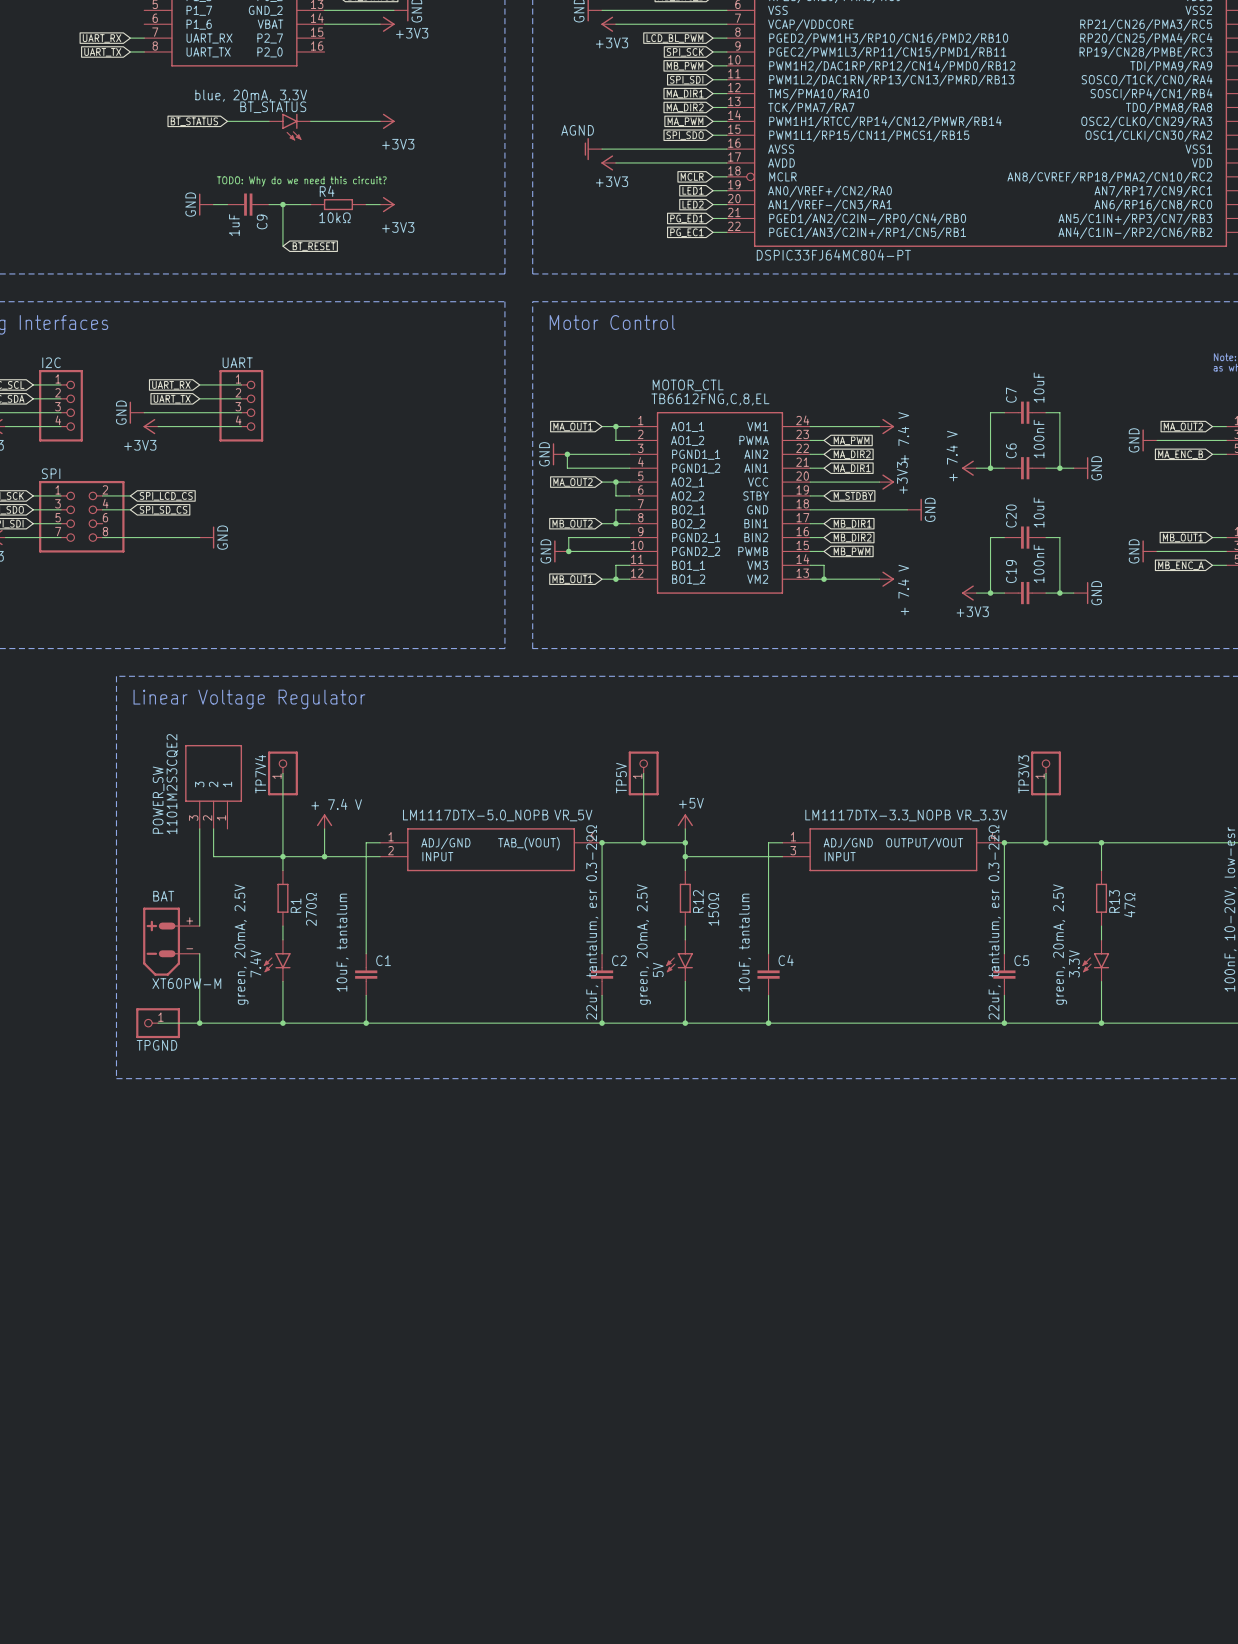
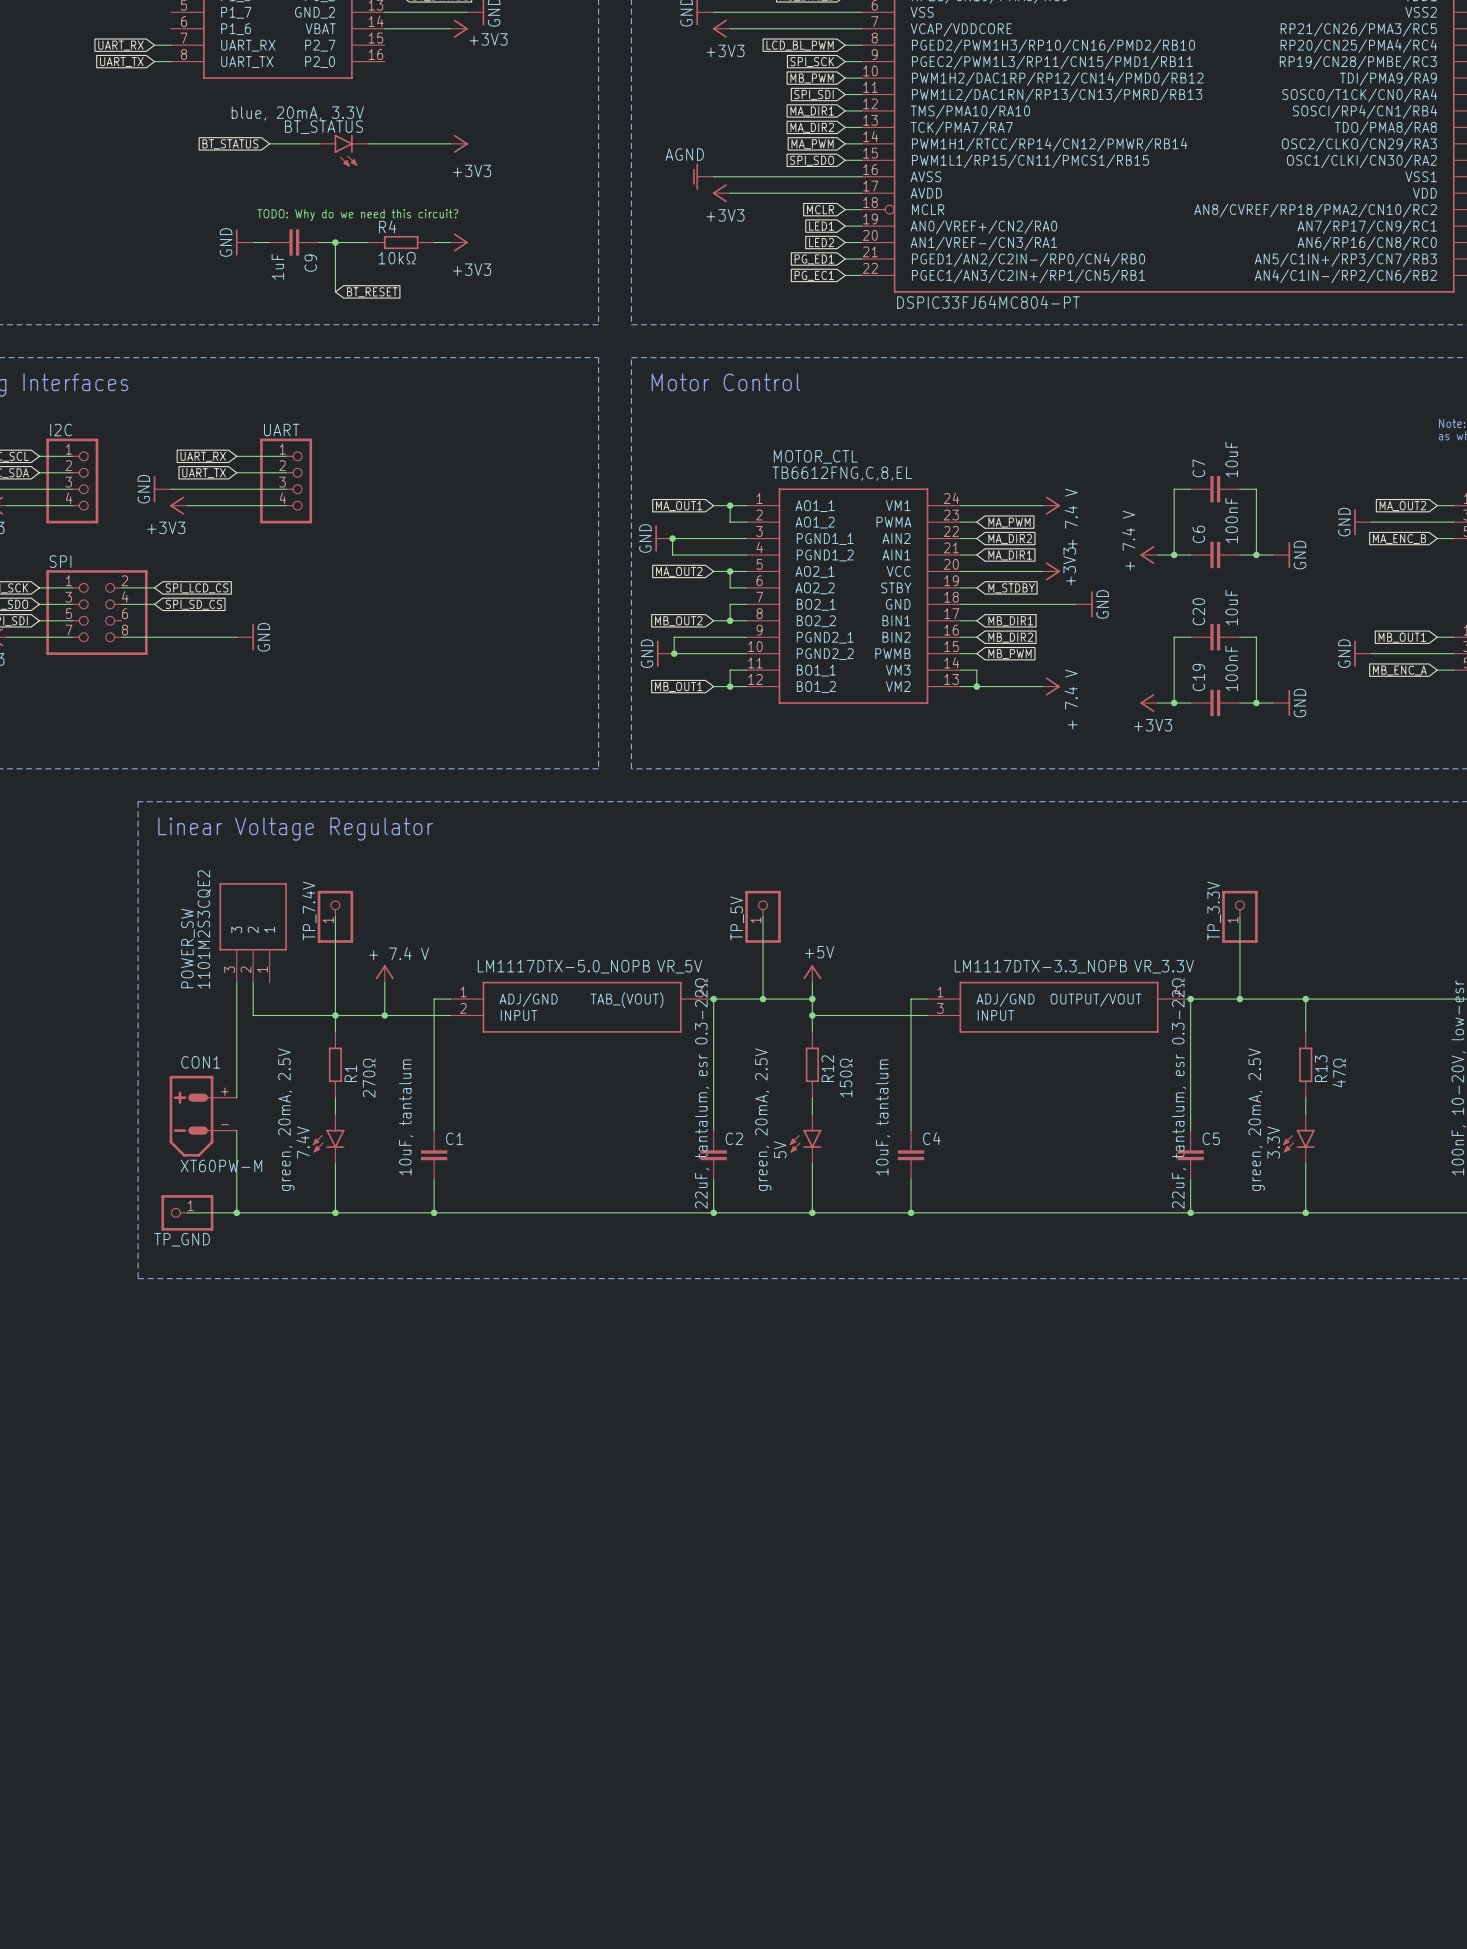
TP7V4 name: TP7V4 (260, 774) -> TP_7.4V (309, 911)
TP3V3 name: TP3V3 (1023, 774) -> TP_3.3V (1214, 911)
TP5V name: TP5V (621, 778) -> TP_5V (737, 918)
BAT name: BAT (163, 896) -> CON1 (200, 1062)
TPGND name: TPGND (156, 1045) -> TP_GND (182, 1239)

